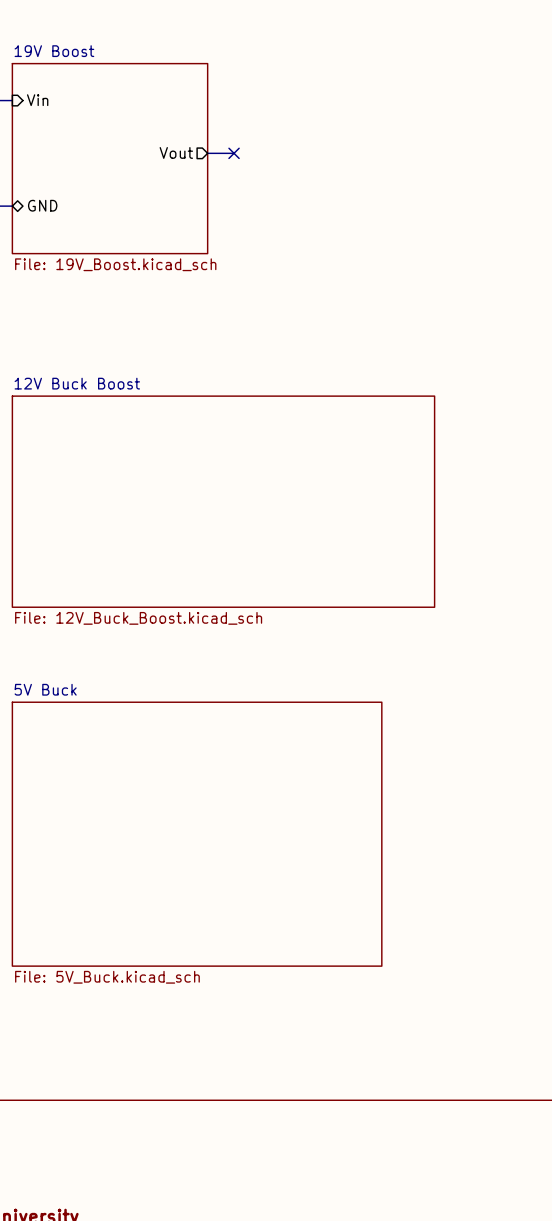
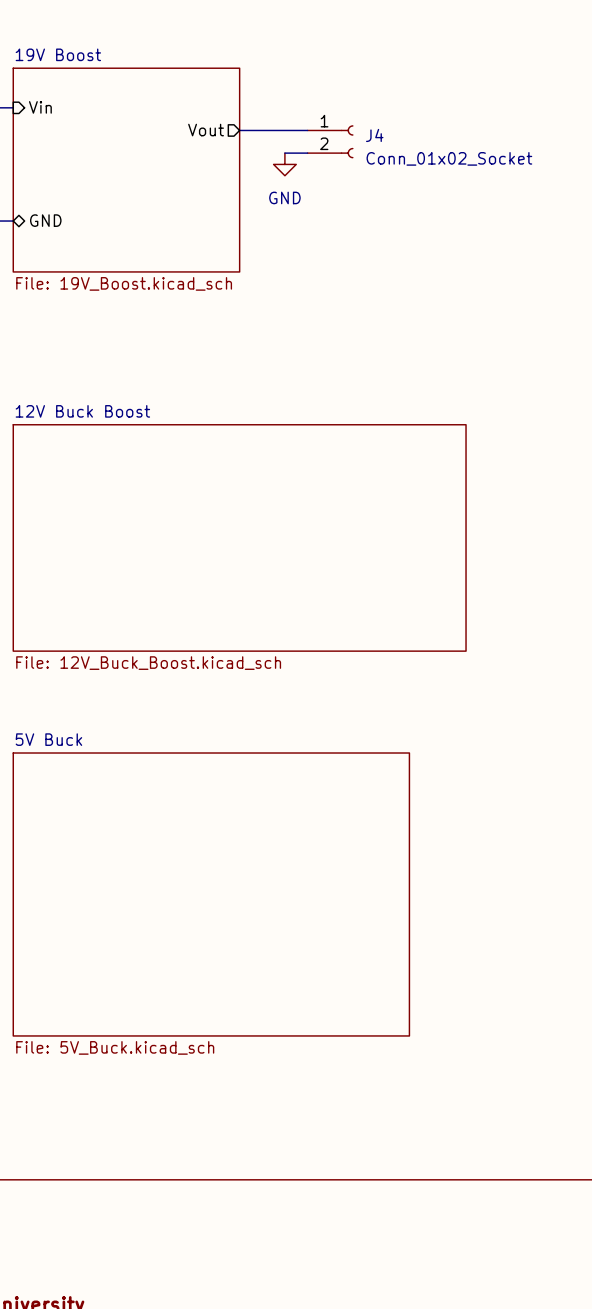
sheet 19V Boost shape: [11, 62, 209, 255] -> [12, 67, 241, 273]
wire: none -> (239, 130) (307, 130)
J4: none -> Conn_01x02_Socket (330, 141)
wire: none -> (284, 153) (307, 153)
sheet pin position: Vout (176, 152) -> Vout (206, 130)
wire: (207, 153) (234, 153) -> none
no-connect mark: (234, 153) -> none
power symbol: none -> GND (284, 164)

